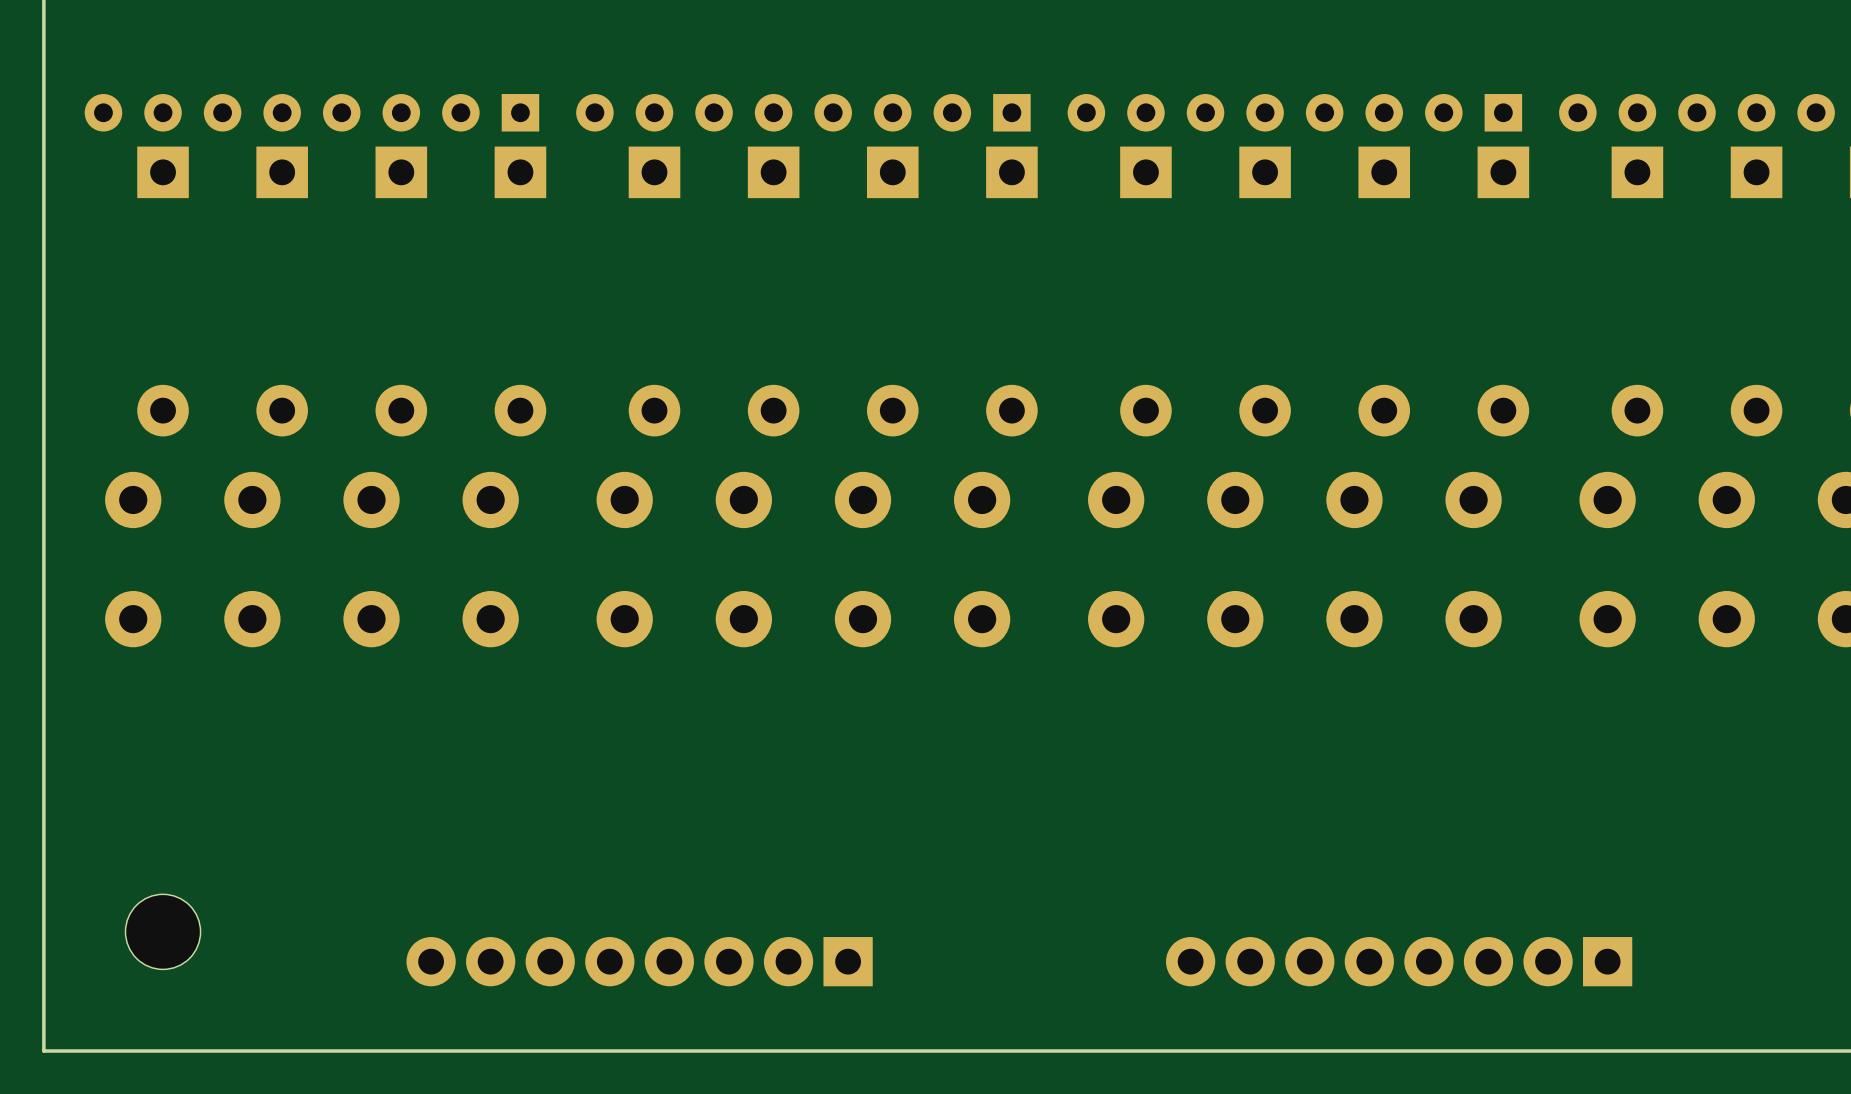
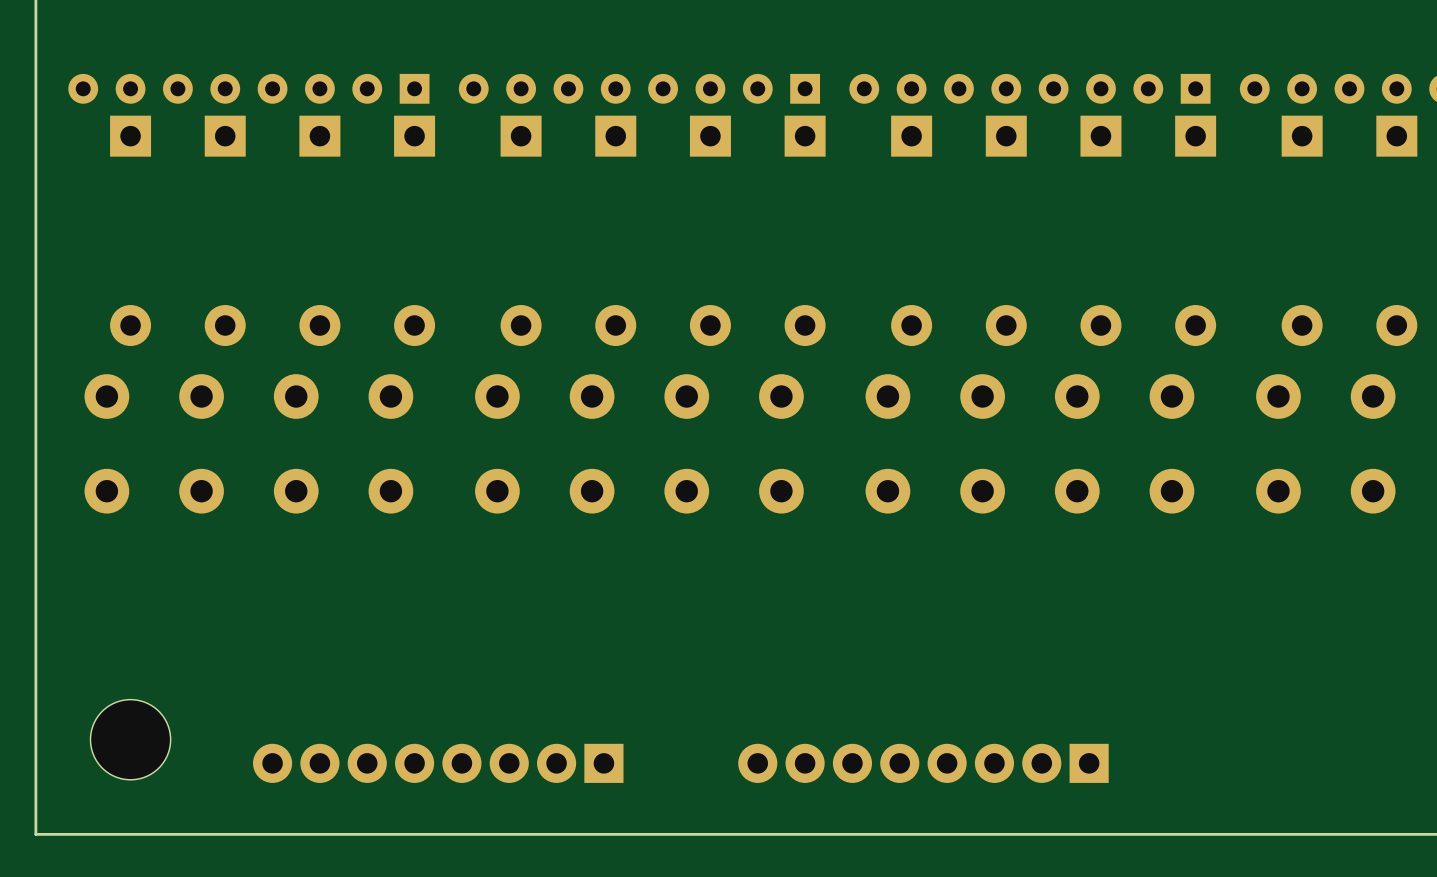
part footprint: [125, 894, 201, 970] -> [90, 699, 171, 780]
part position: (639, 961) -> (438, 763)
part position: (1399, 961) -> (923, 763)

